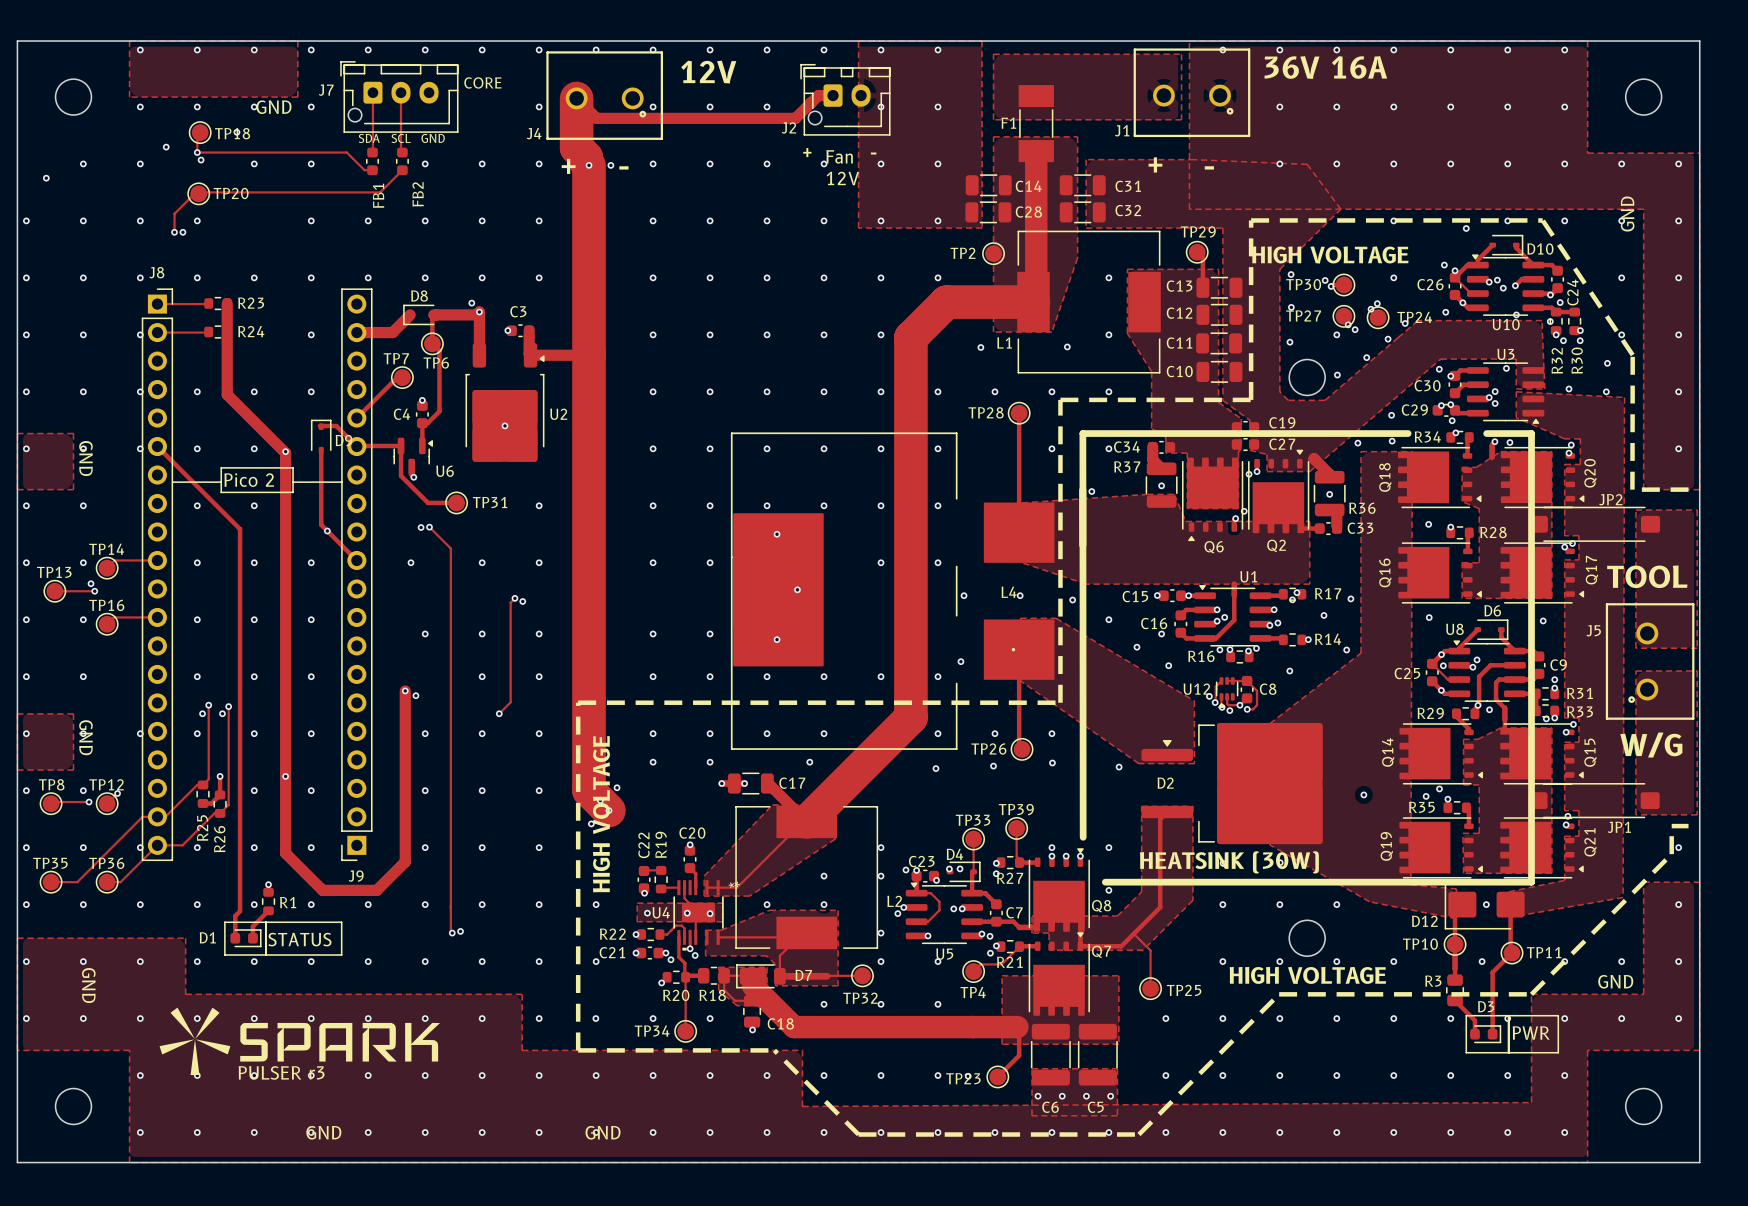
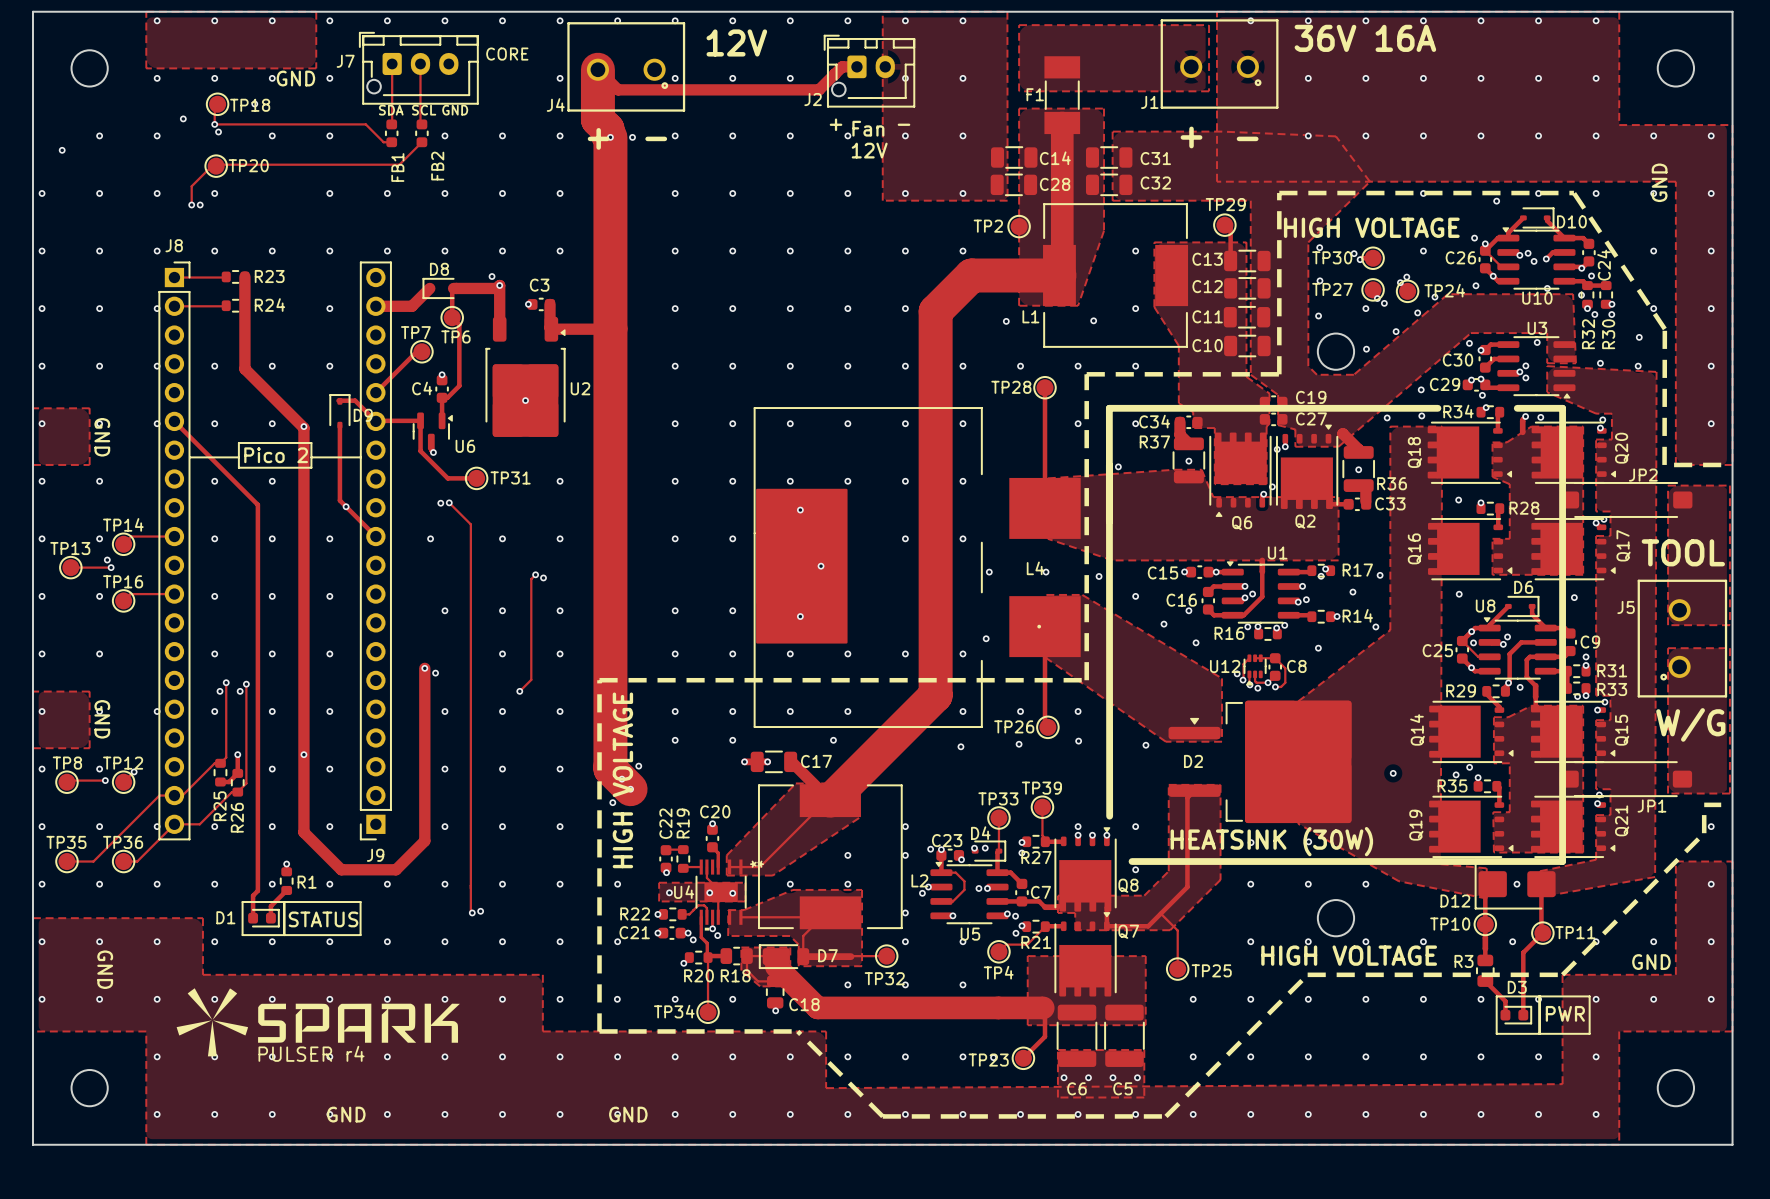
text: PULSER r3 (281, 1072) -> PULSER r4 (311, 1053)

